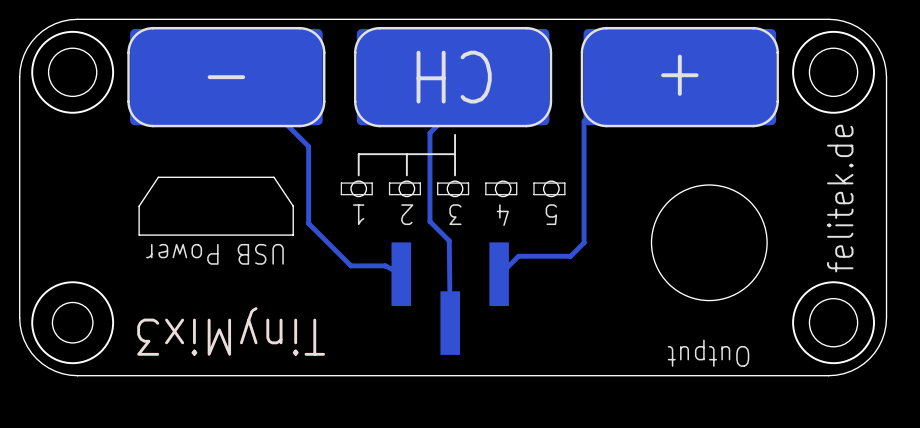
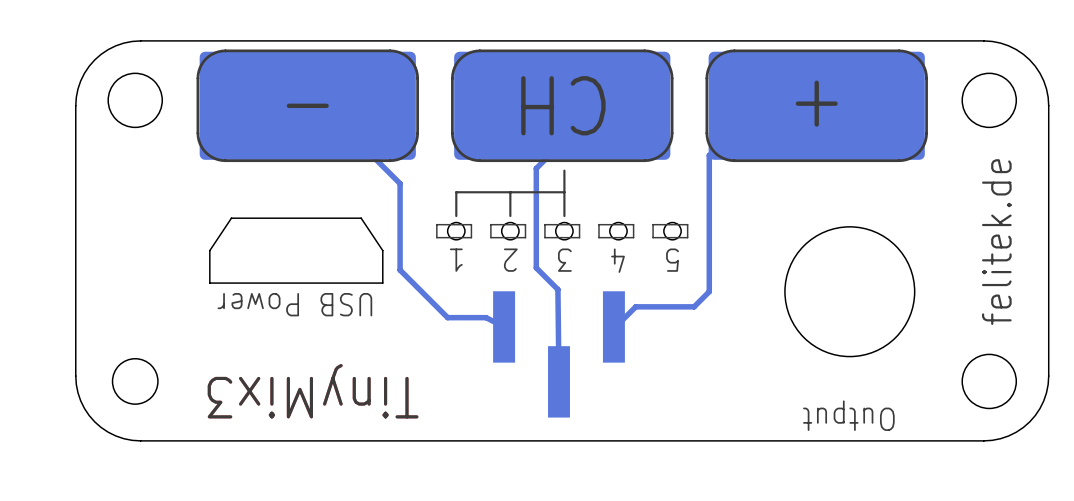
round board edge: [31, 30, 115, 114] -> none
round board edge: [792, 30, 875, 114] -> none
round board edge: [31, 281, 115, 365] -> none
round board edge: [792, 281, 875, 365] -> none

